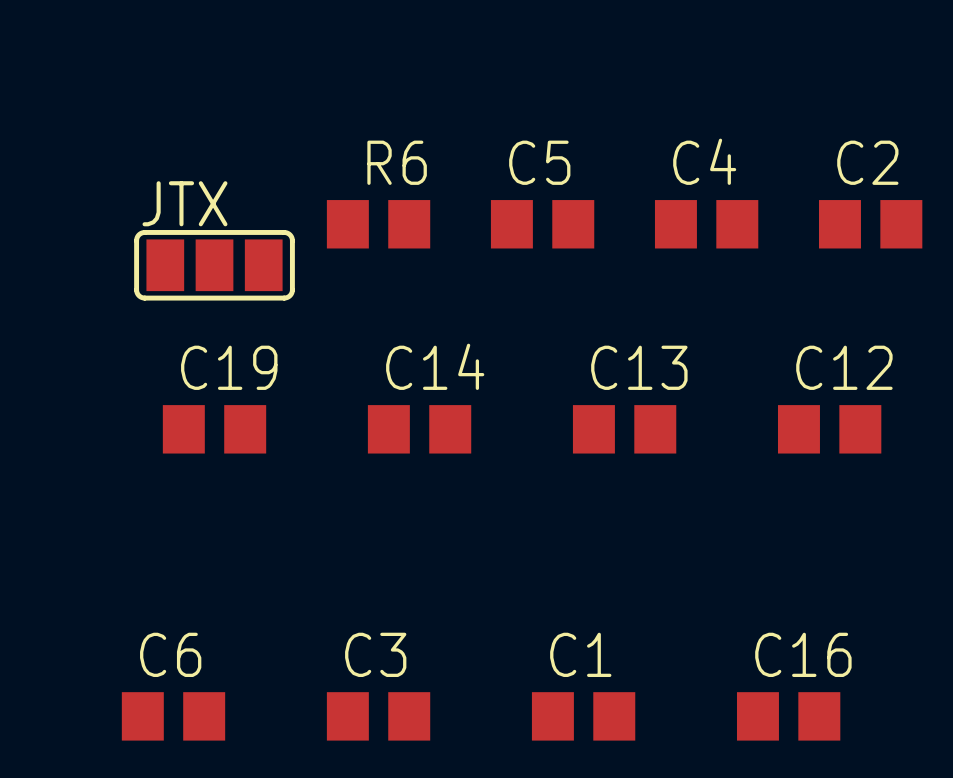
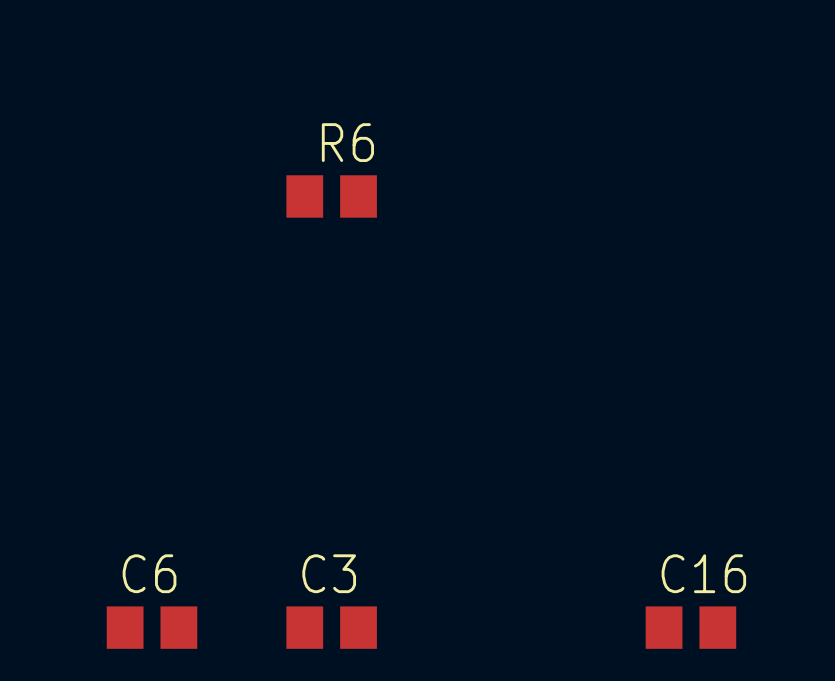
C5: (542, 224) -> none
C4: (706, 224) -> none
C2: (870, 224) -> none
JTX: (214, 265) -> none
C19: (214, 429) -> none
C14: (419, 429) -> none
C13: (624, 429) -> none
C12: (829, 429) -> none
C1: (583, 716) -> none

